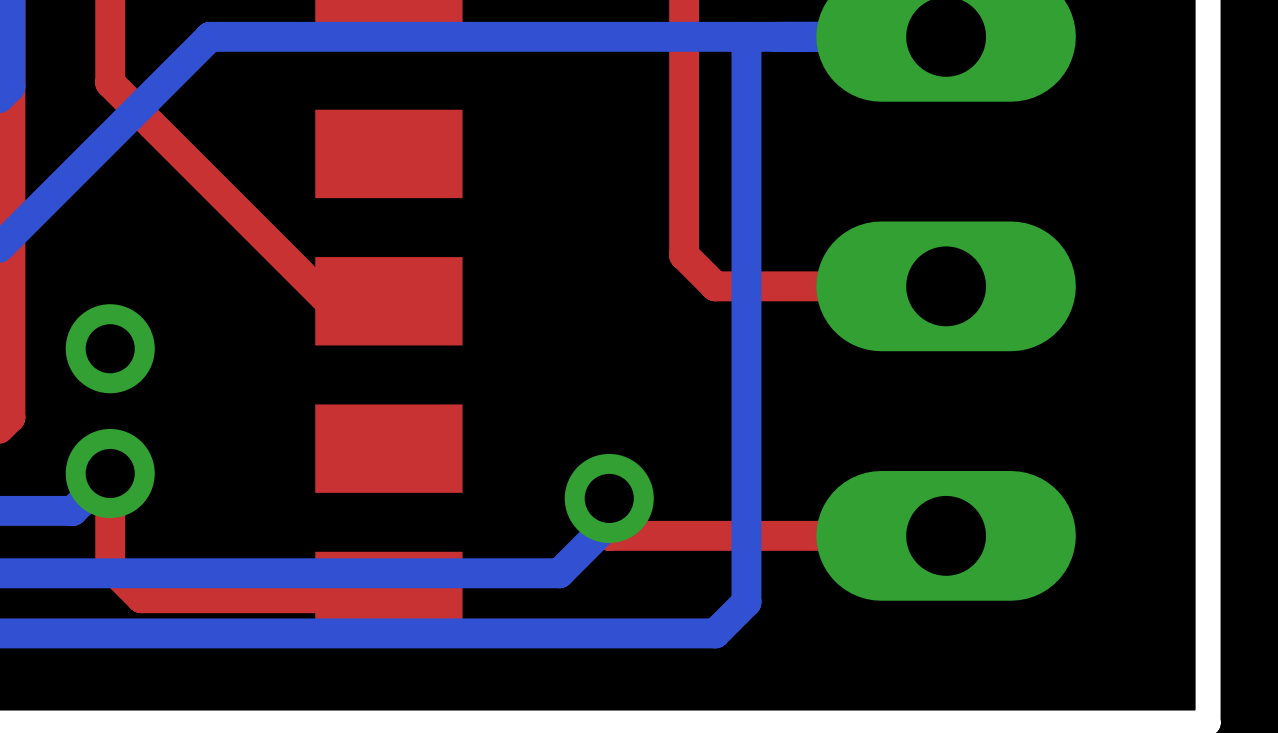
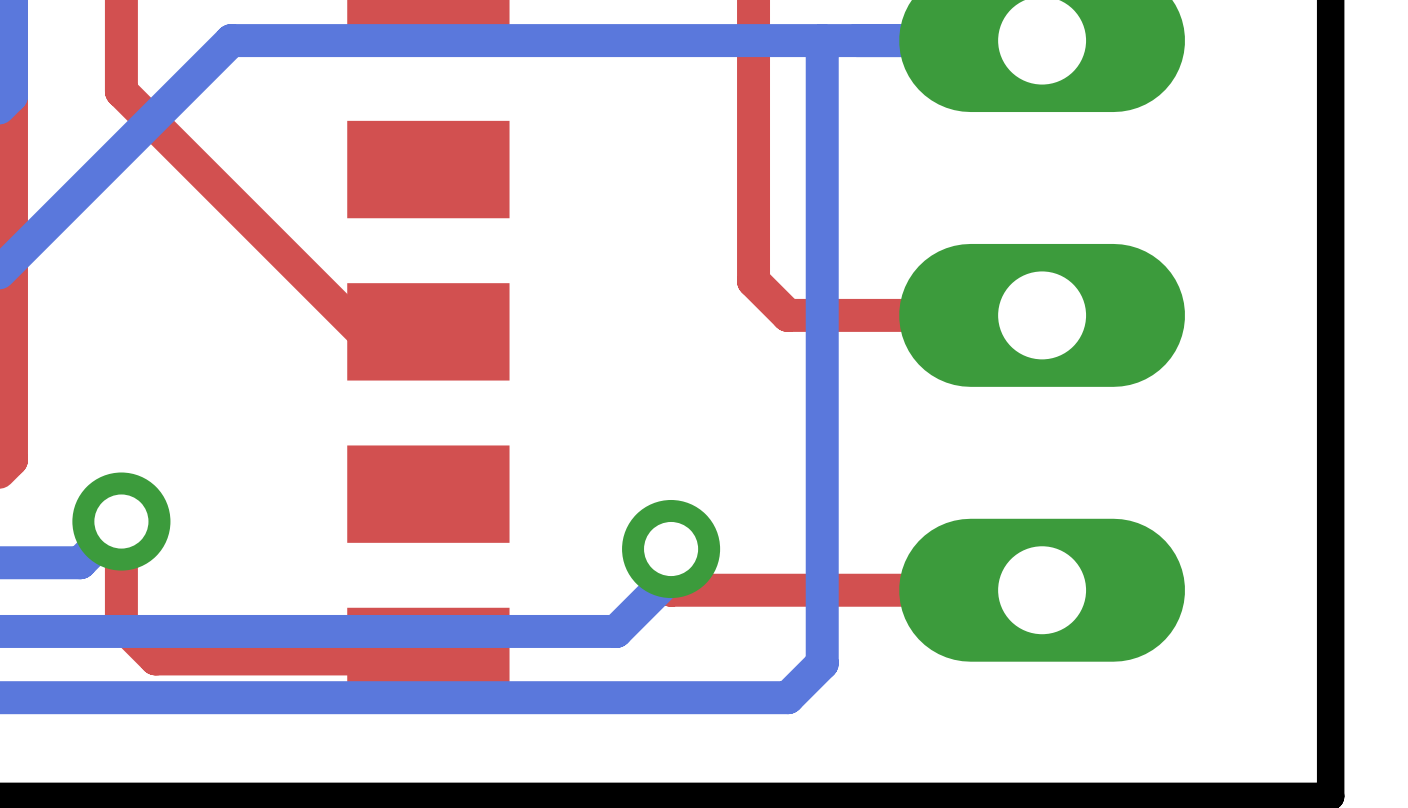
via: (110, 348) -> none

